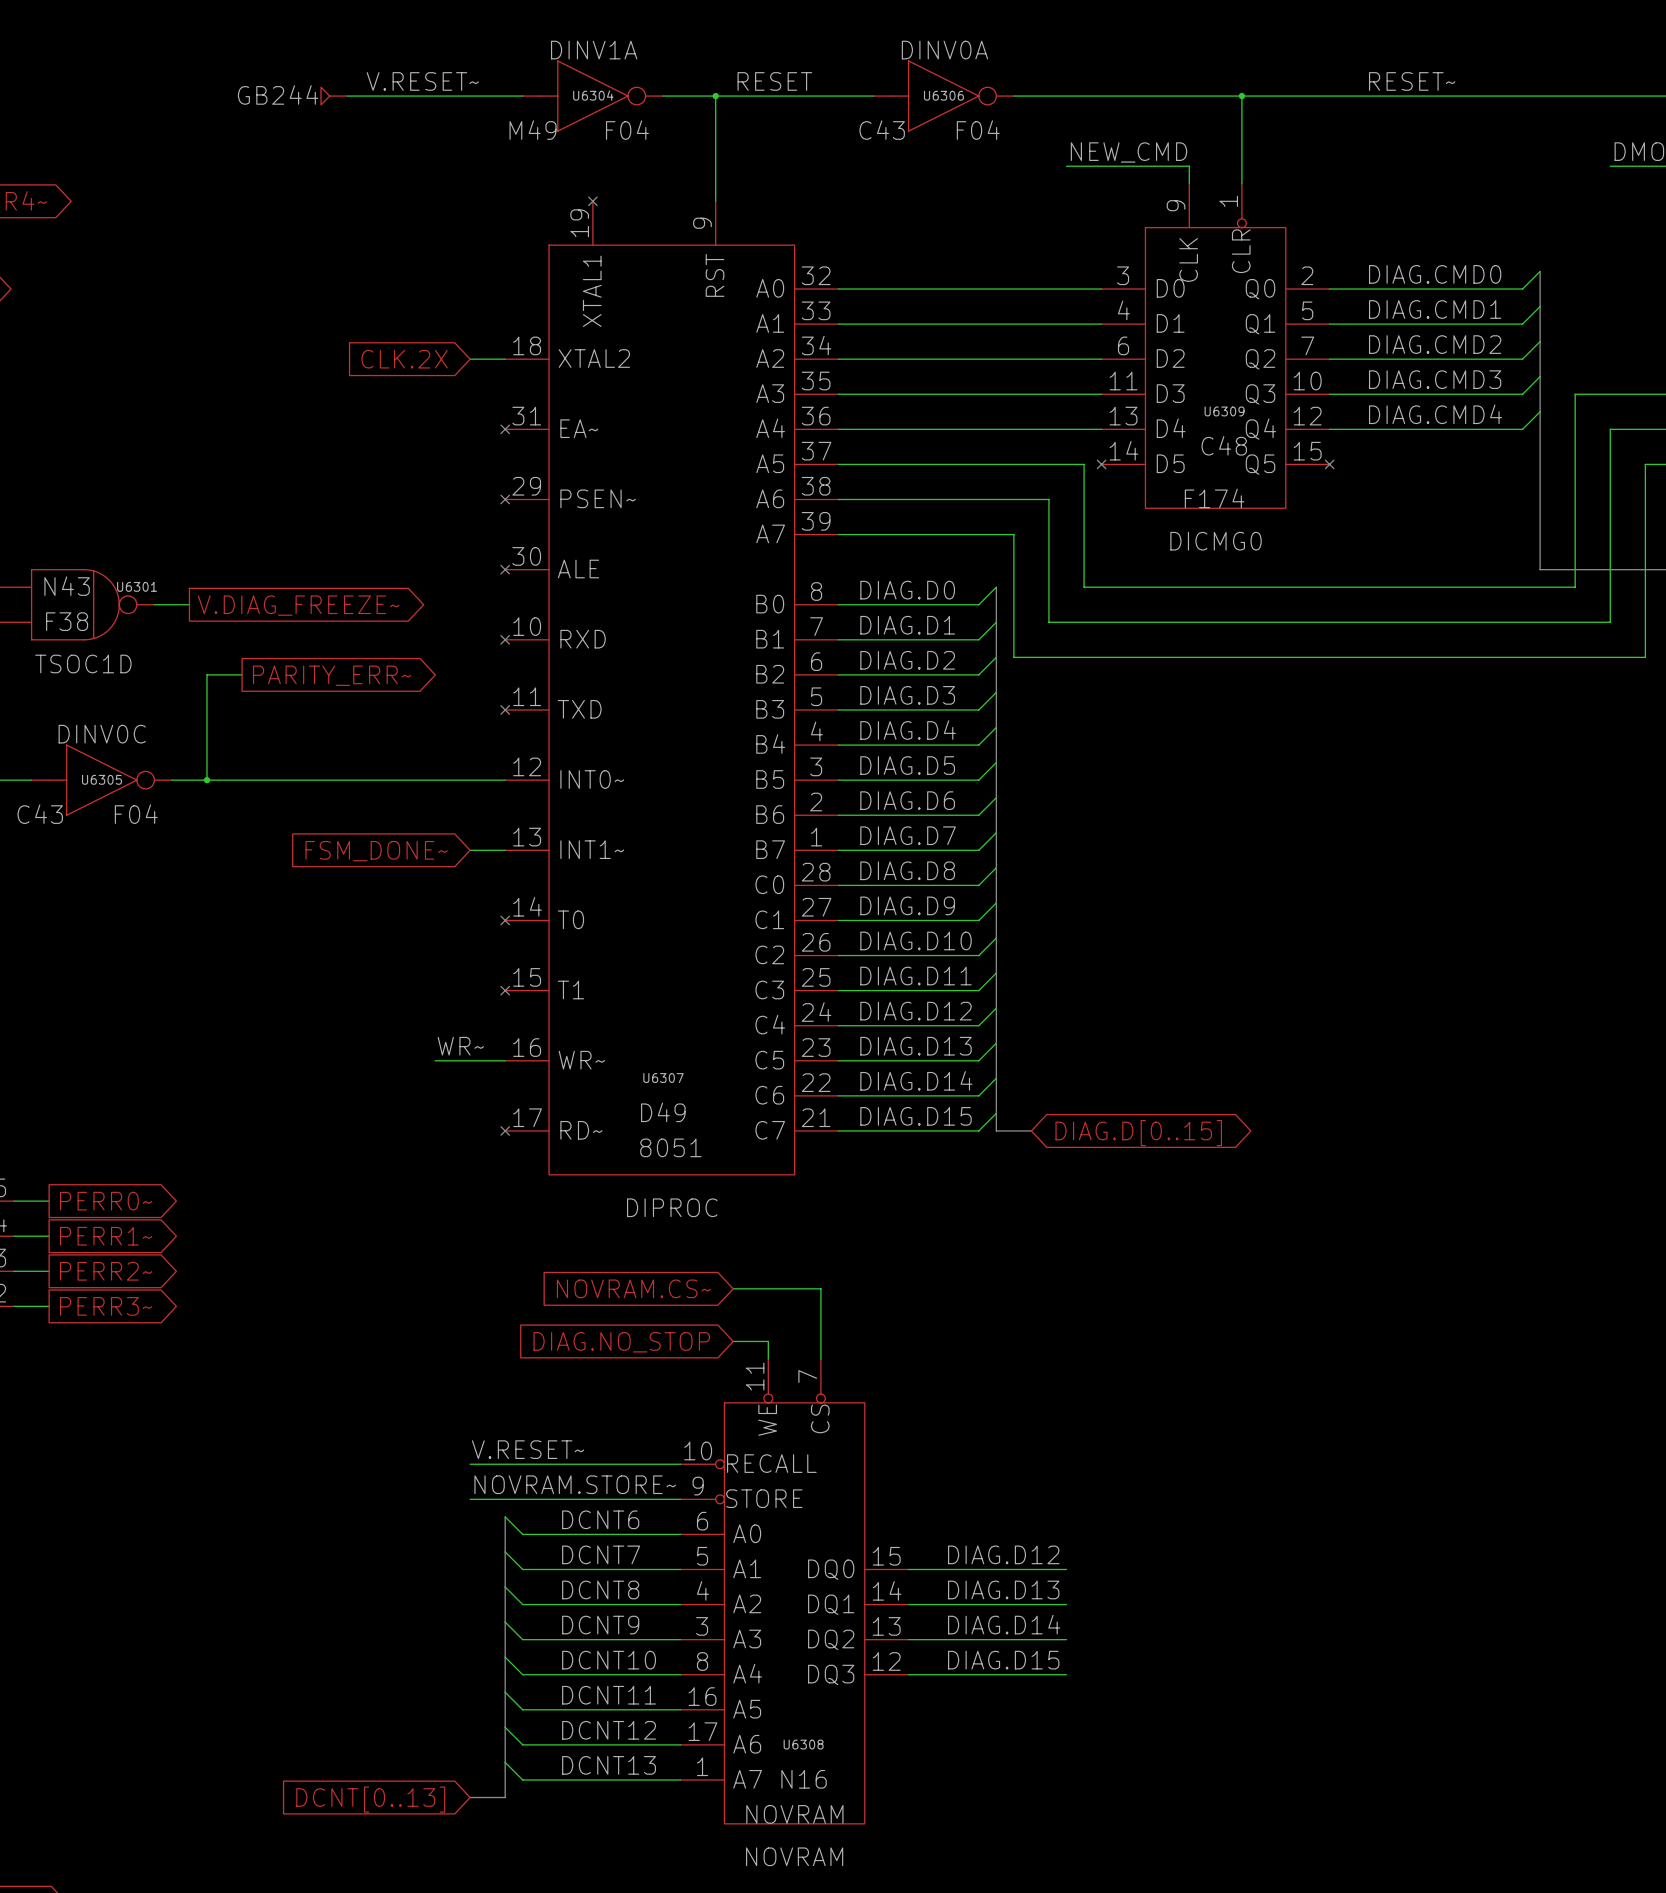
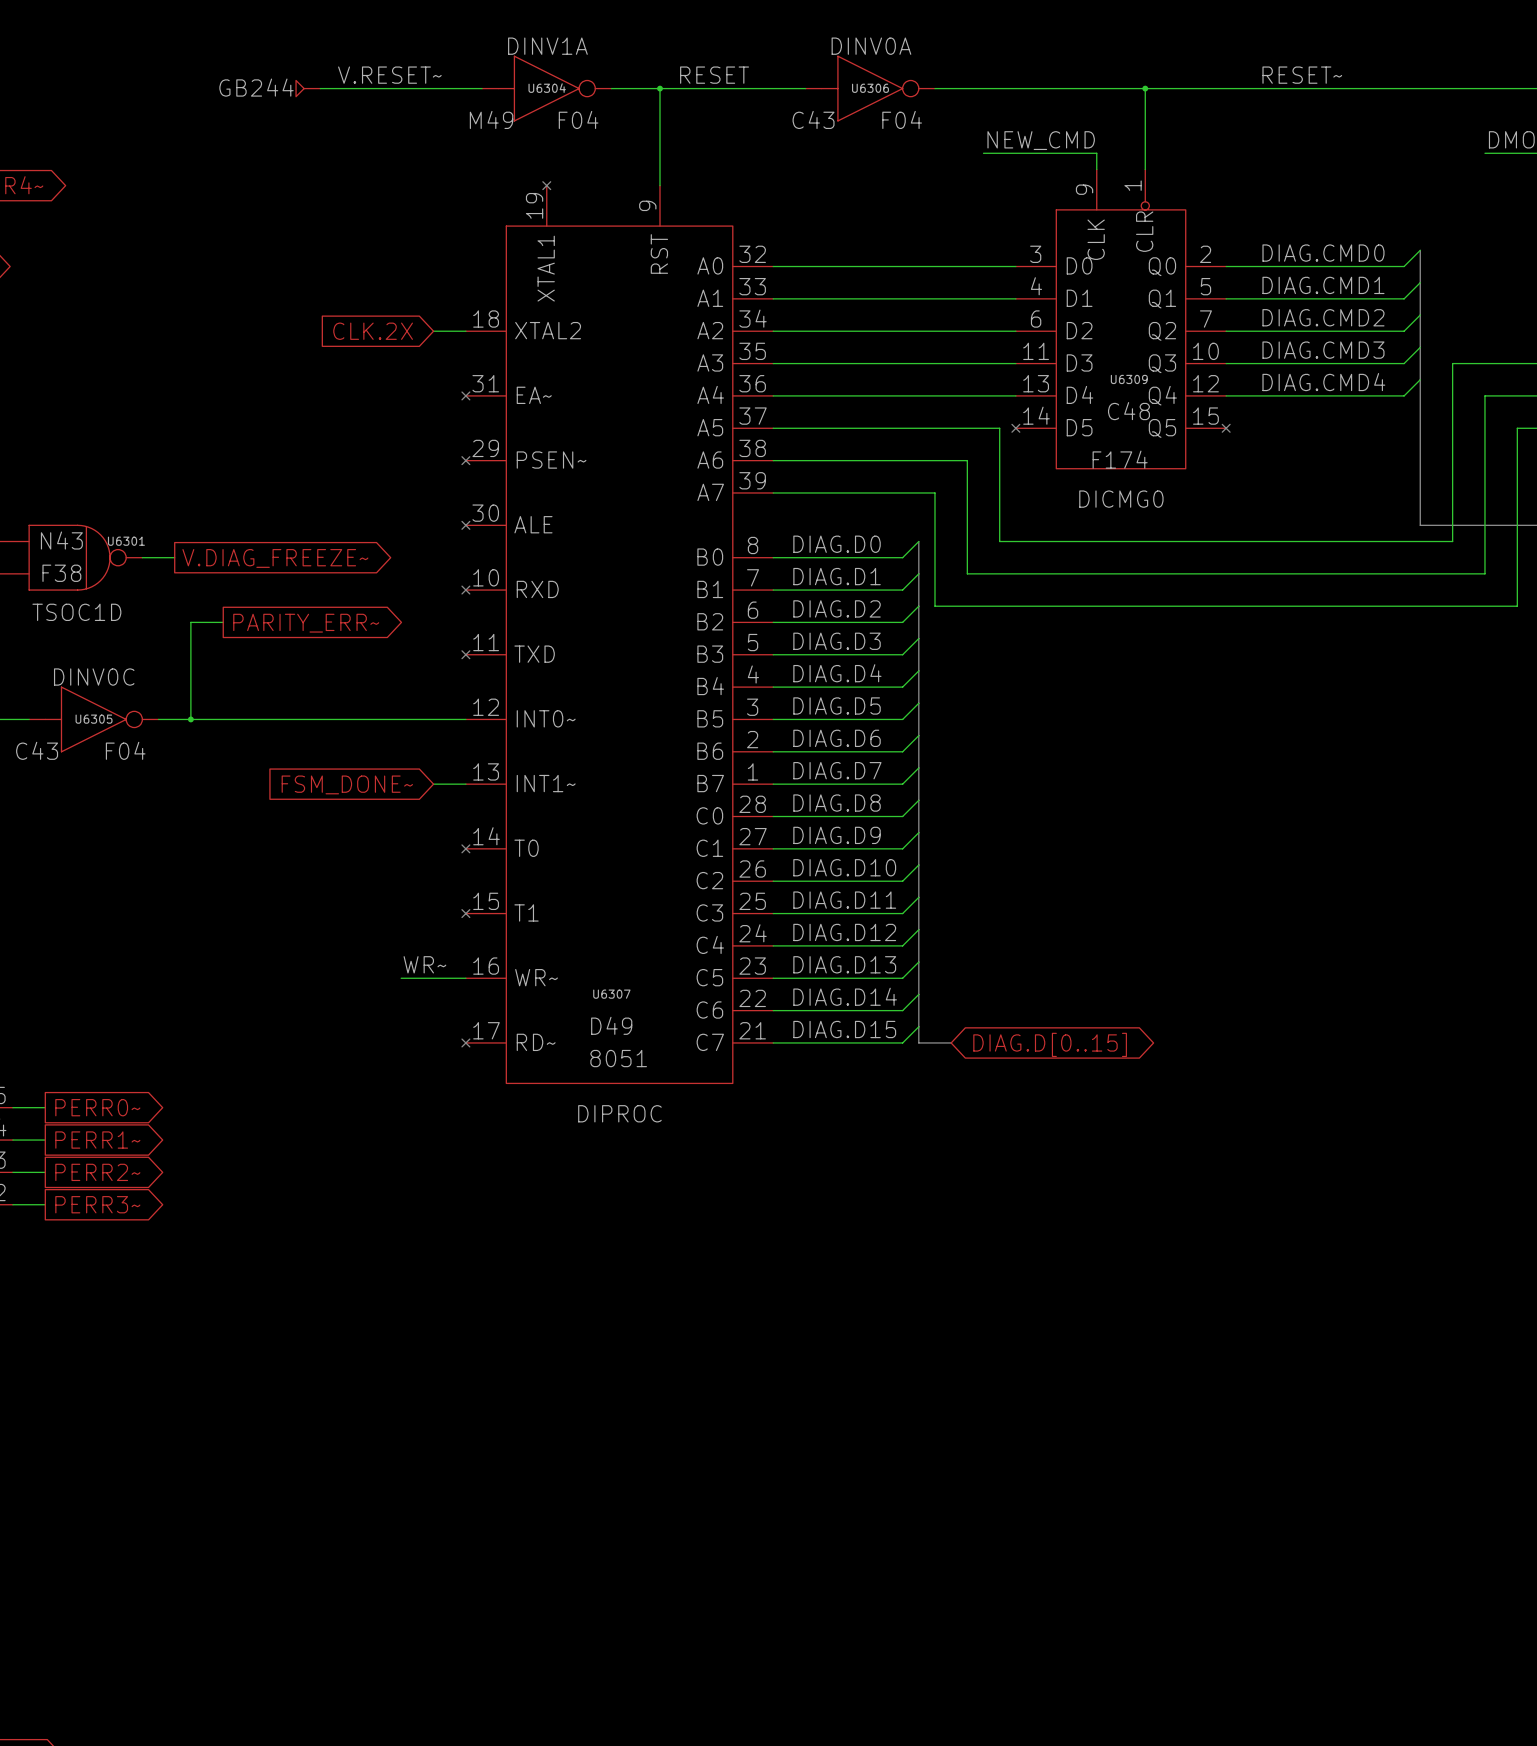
global label: NOVRAM.CS~ (633, 1288) -> none
wire: (733, 1288) (820, 1288) (820, 1359) -> none
wire: (733, 1341) (768, 1341) (768, 1359) -> none
global label: DIAG.NO_STOP (621, 1342) -> none
label: V.RESET~ (528, 1449) -> none
wire: (470, 1464) (680, 1464) -> none
label: NOVRAM.STORE~ (575, 1484) -> none
wire: (470, 1499) (680, 1499) -> none
wire: (505, 1516) (522, 1534) (680, 1534) -> none
bus: (505, 1516) (505, 1797) (470, 1797) -> none
label: DCNT6 (600, 1519) -> none
wire: (505, 1551) (522, 1569) (680, 1569) -> none
label: DCNT7 (601, 1554) -> none
label: DIAG.D12 (1003, 1554) -> none
wire: (908, 1569) (1066, 1569) -> none
wire: (505, 1587) (522, 1604) (680, 1604) -> none
label: DCNT8 (600, 1589) -> none
label: DIAG.D13 (1003, 1589) -> none
U6308: NOVRAM (794, 1591) -> none
wire: (908, 1604) (1066, 1604) -> none
wire: (505, 1622) (522, 1639) (680, 1639) -> none
label: DIAG.D14 (1004, 1624) -> none
label: DCNT9 (600, 1625) -> none
wire: (908, 1639) (1066, 1639) -> none
wire: (505, 1657) (522, 1674) (680, 1674) -> none
label: DCNT10 (609, 1660) -> none
label: DIAG.D15 (1003, 1660) -> none
wire: (908, 1674) (1066, 1674) -> none
wire: (505, 1692) (522, 1709) (680, 1709) -> none
label: DCNT11 (609, 1695) -> none
wire: (505, 1727) (522, 1744) (680, 1744) -> none
label: DCNT12 (609, 1730) -> none
wire: (505, 1762) (522, 1779) (680, 1779) -> none
label: DCNT13 (609, 1765) -> none
global label: DCNT[0..13] (370, 1799) -> none

